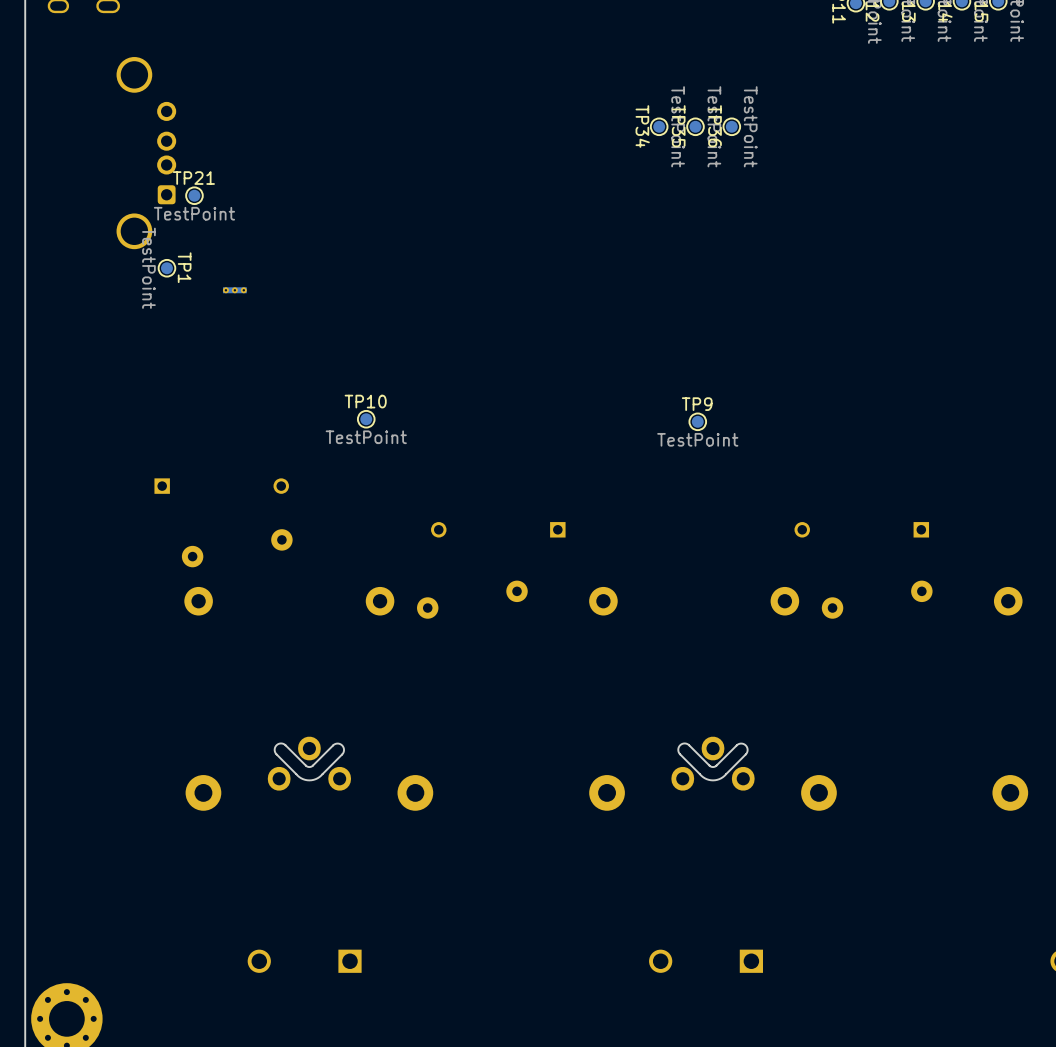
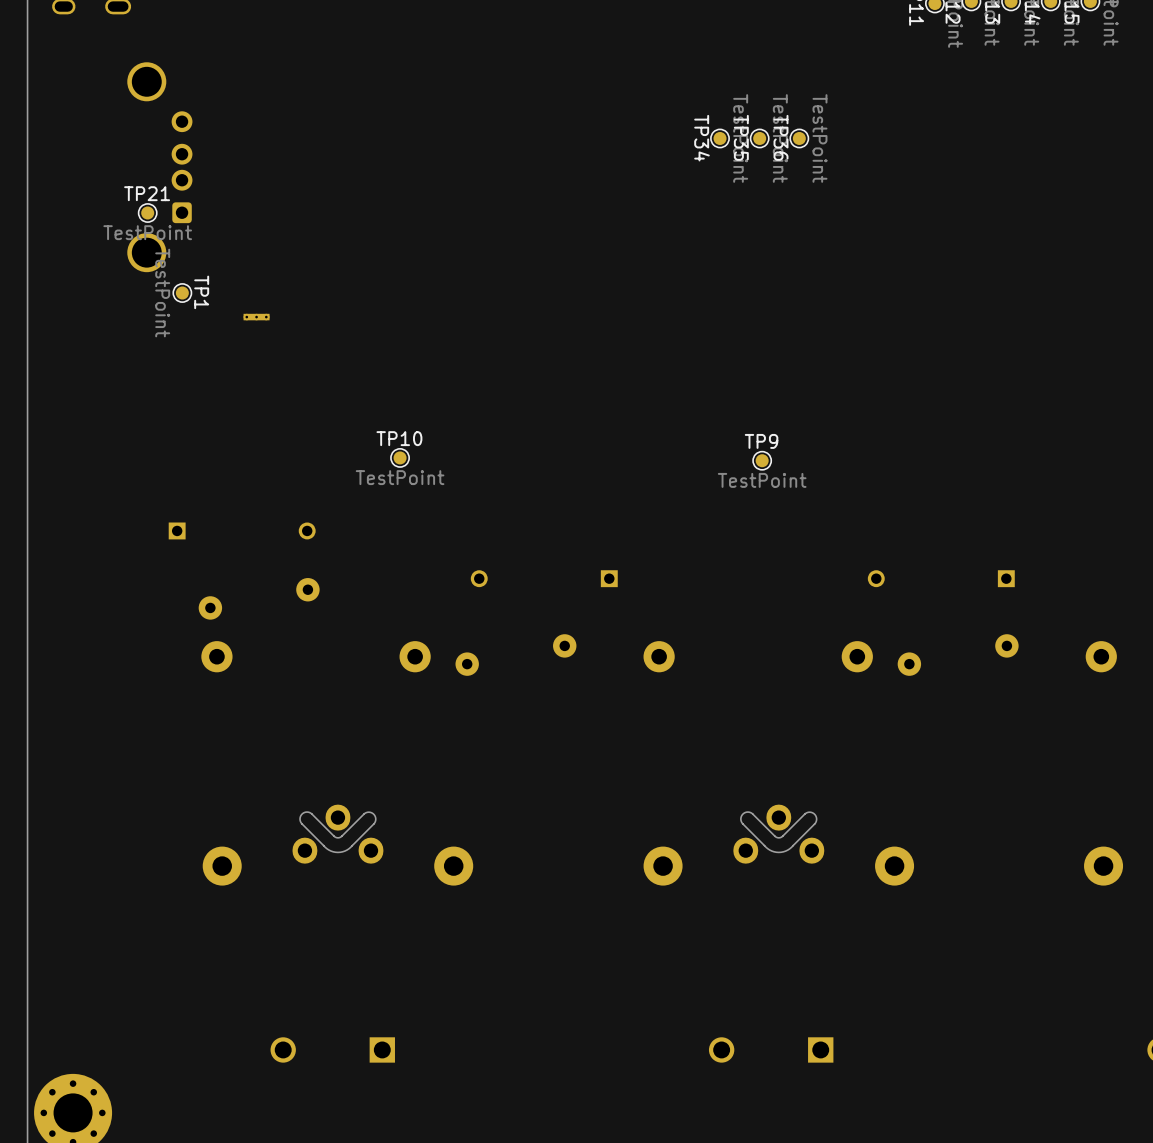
TP21 position: (194, 195) -> (147, 213)

